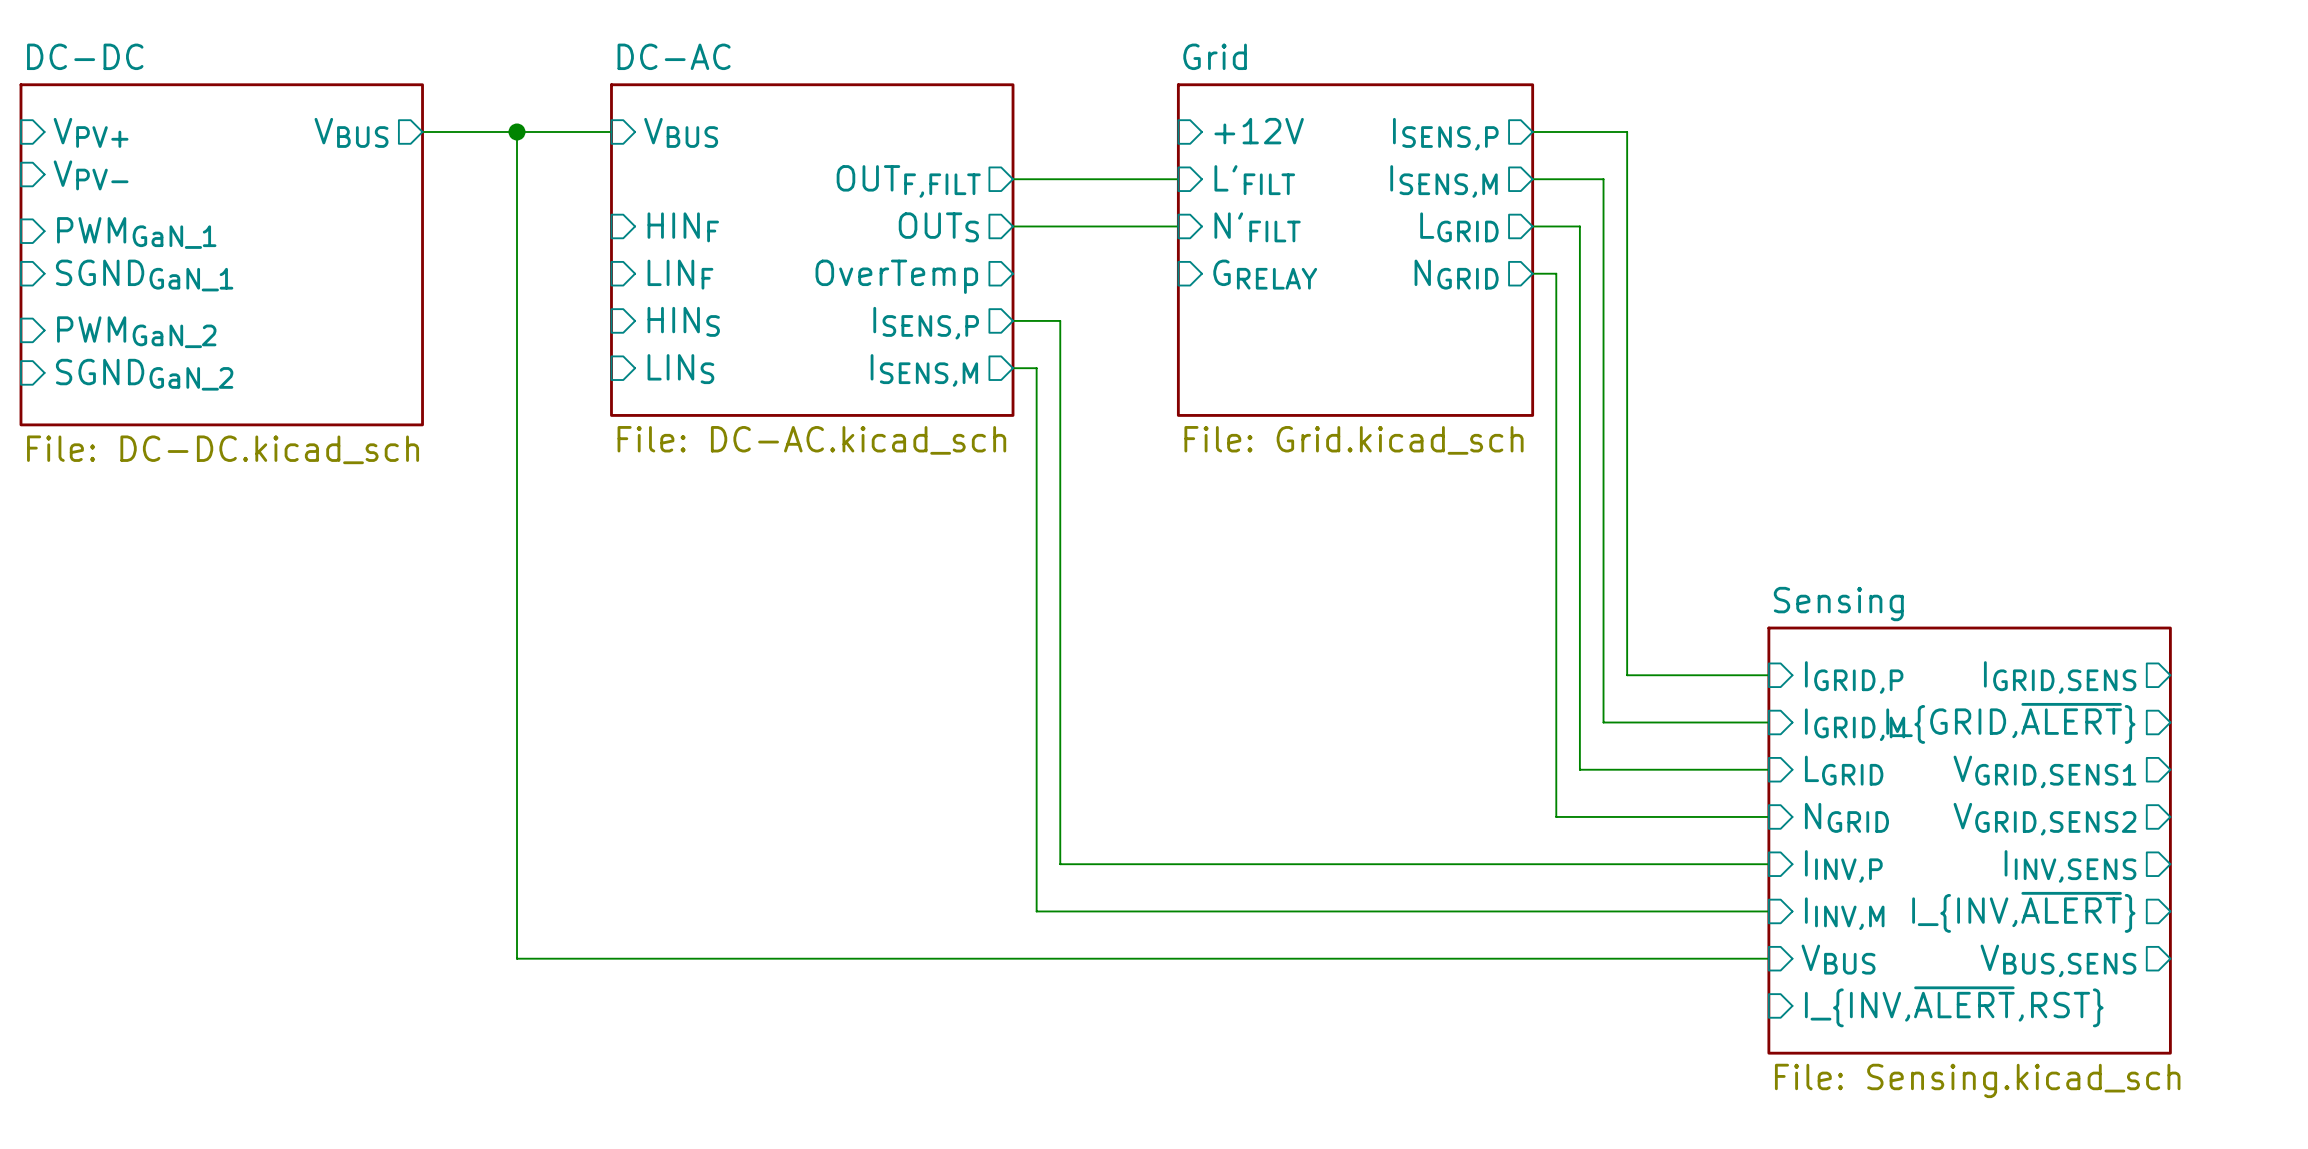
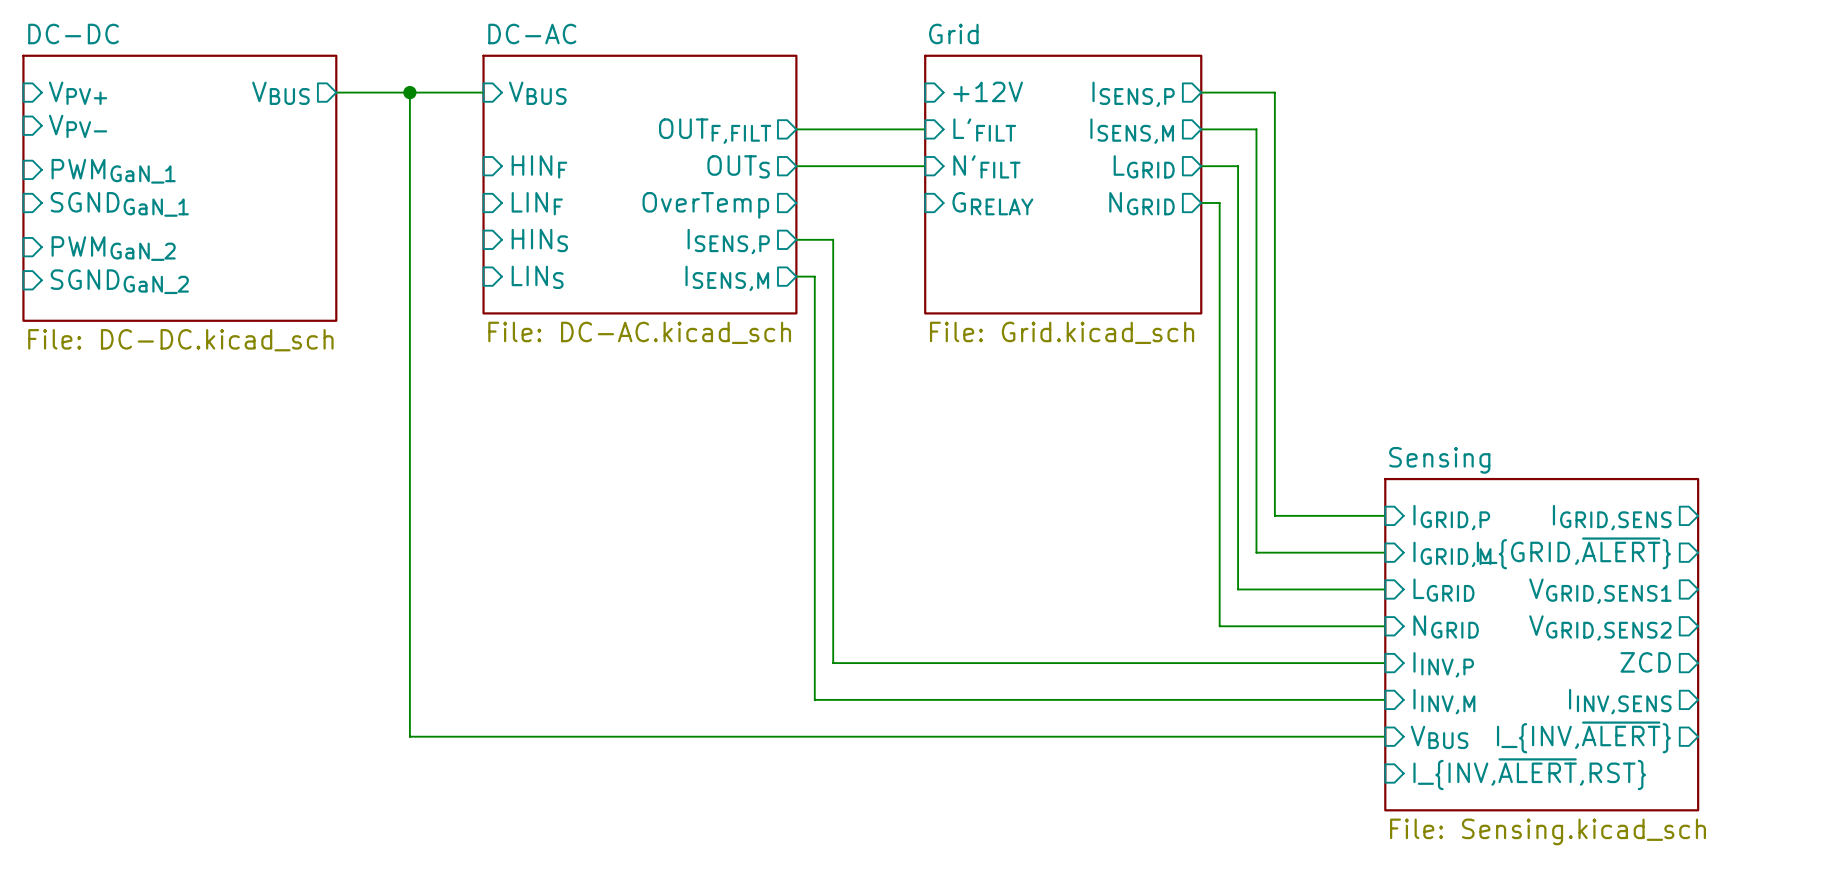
sheet pin: IINV,SENS (2070, 866) -> ZCD (1645, 662)
sheet pin: I_{INV,~{ALERT}} (2023, 912) -> IINV,SENS (1620, 701)
sheet pin: VBUS,SENS (2058, 960) -> I_{INV,~{ALERT}} (1583, 737)

